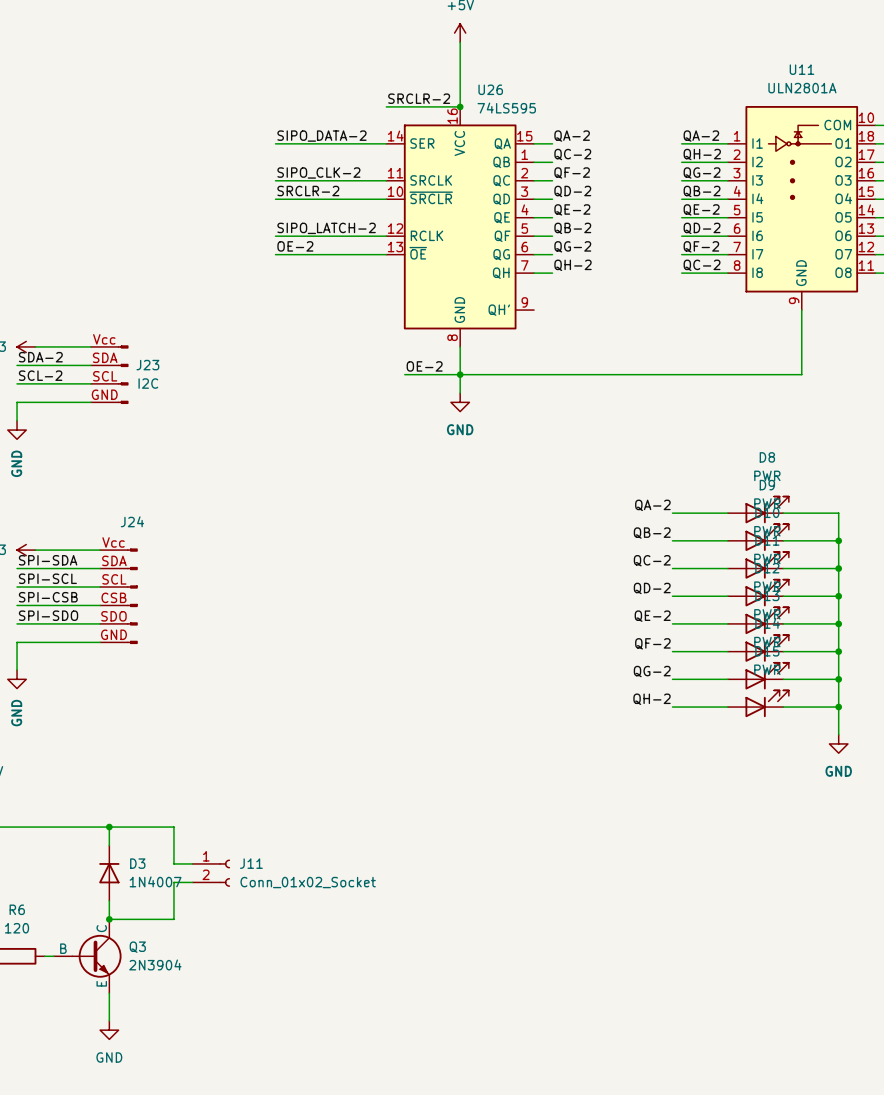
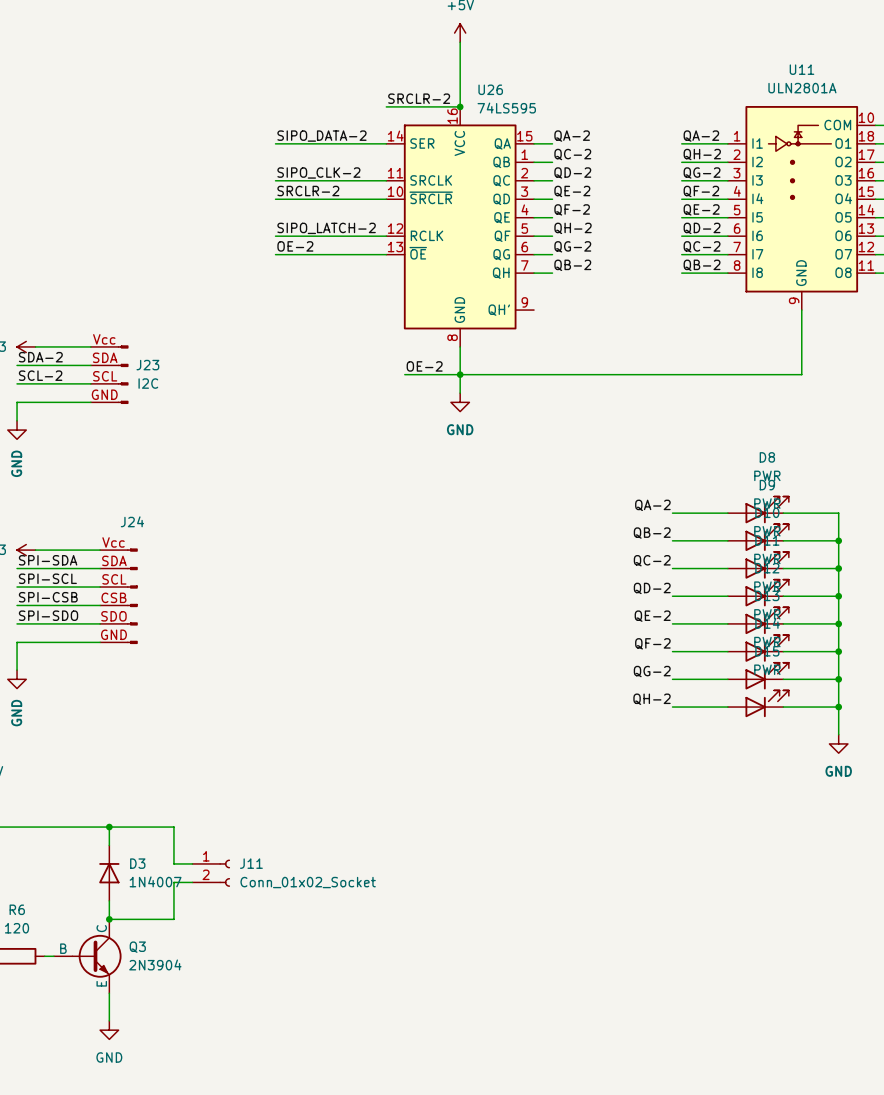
label: QF-2 (572, 172) -> QD-2 (572, 172)
label: QD-2 (572, 191) -> QE-2 (572, 191)
label: QB-2 (702, 191) -> QF-2 (701, 191)
label: QE-2 (572, 209) -> QF-2 (572, 209)
label: QB-2 (572, 228) -> QH-2 (573, 228)
label: QF-2 (701, 246) -> QC-2 (702, 246)
label: QH-2 (573, 265) -> QB-2 (572, 265)
label: QC-2 (702, 265) -> QB-2 (702, 265)

